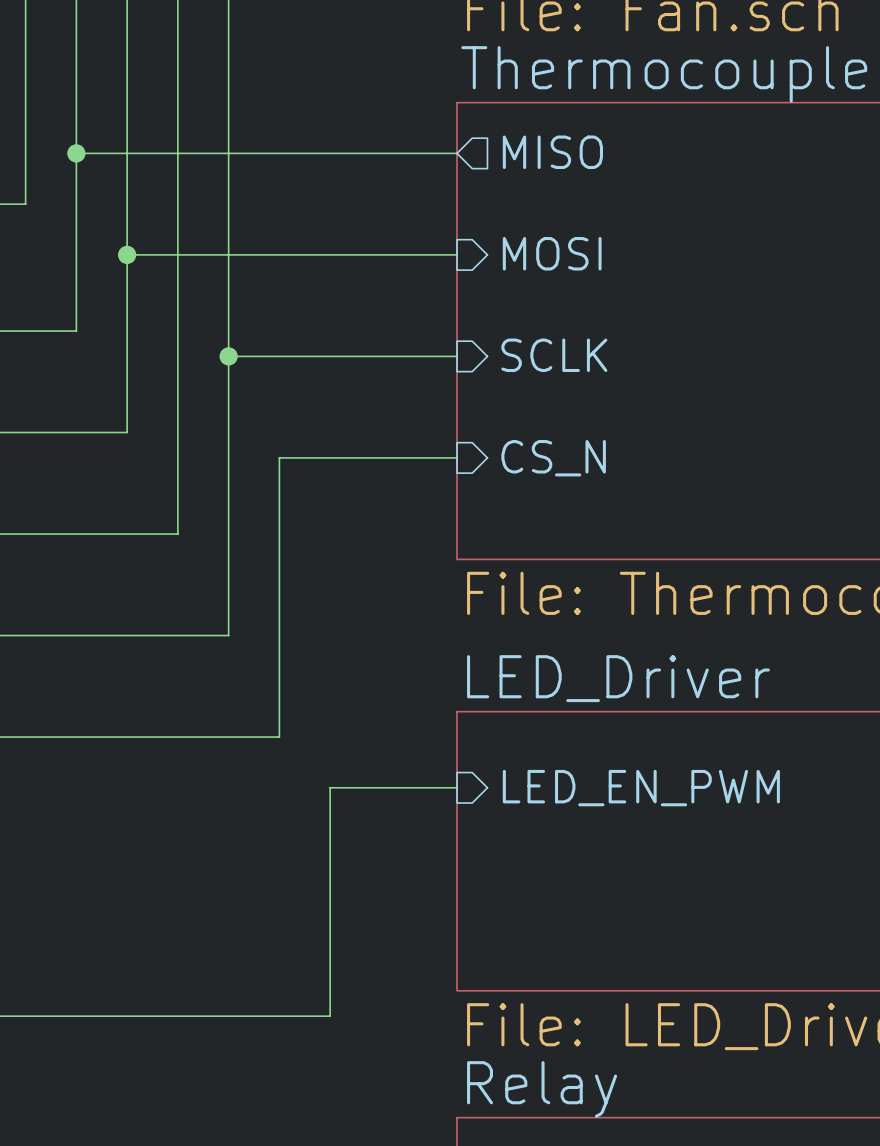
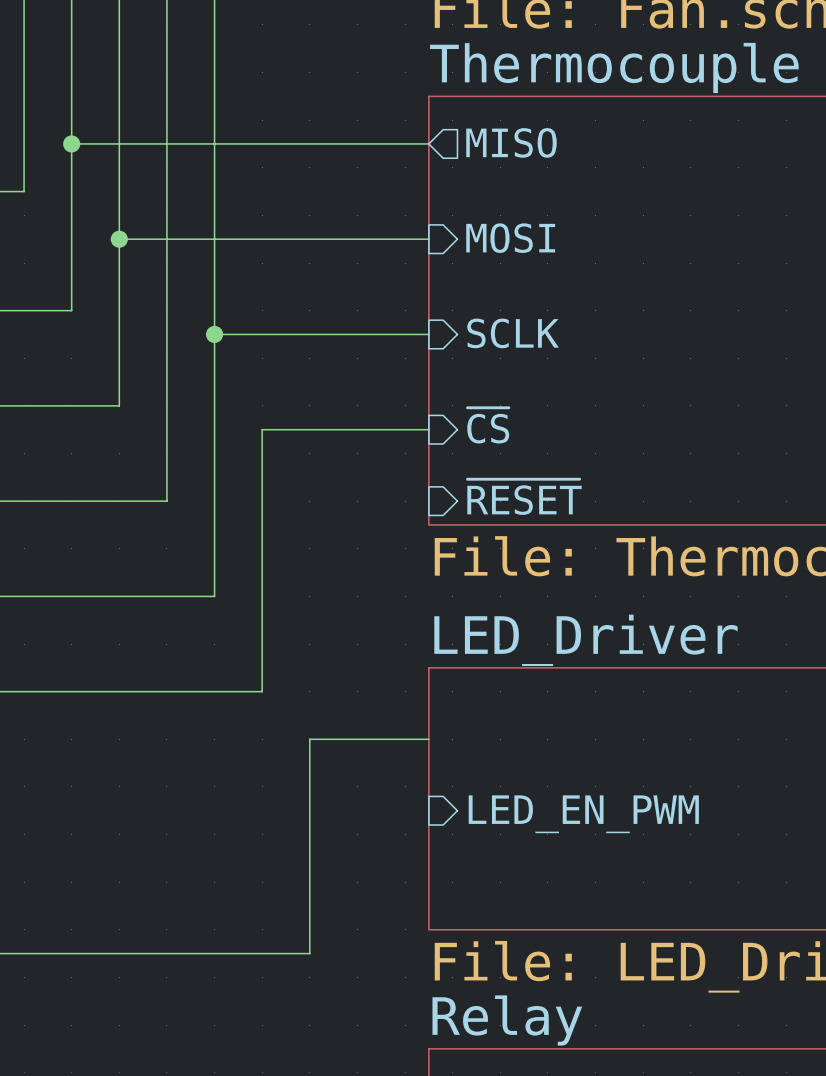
sheet pin: CS_N (553, 458) -> ~{CS} (488, 425)
sheet pin: none -> ~{RESET} (524, 497)
sheet pin position: LED_EN_PWM (641, 788) -> LED_EN_PWM (583, 814)

